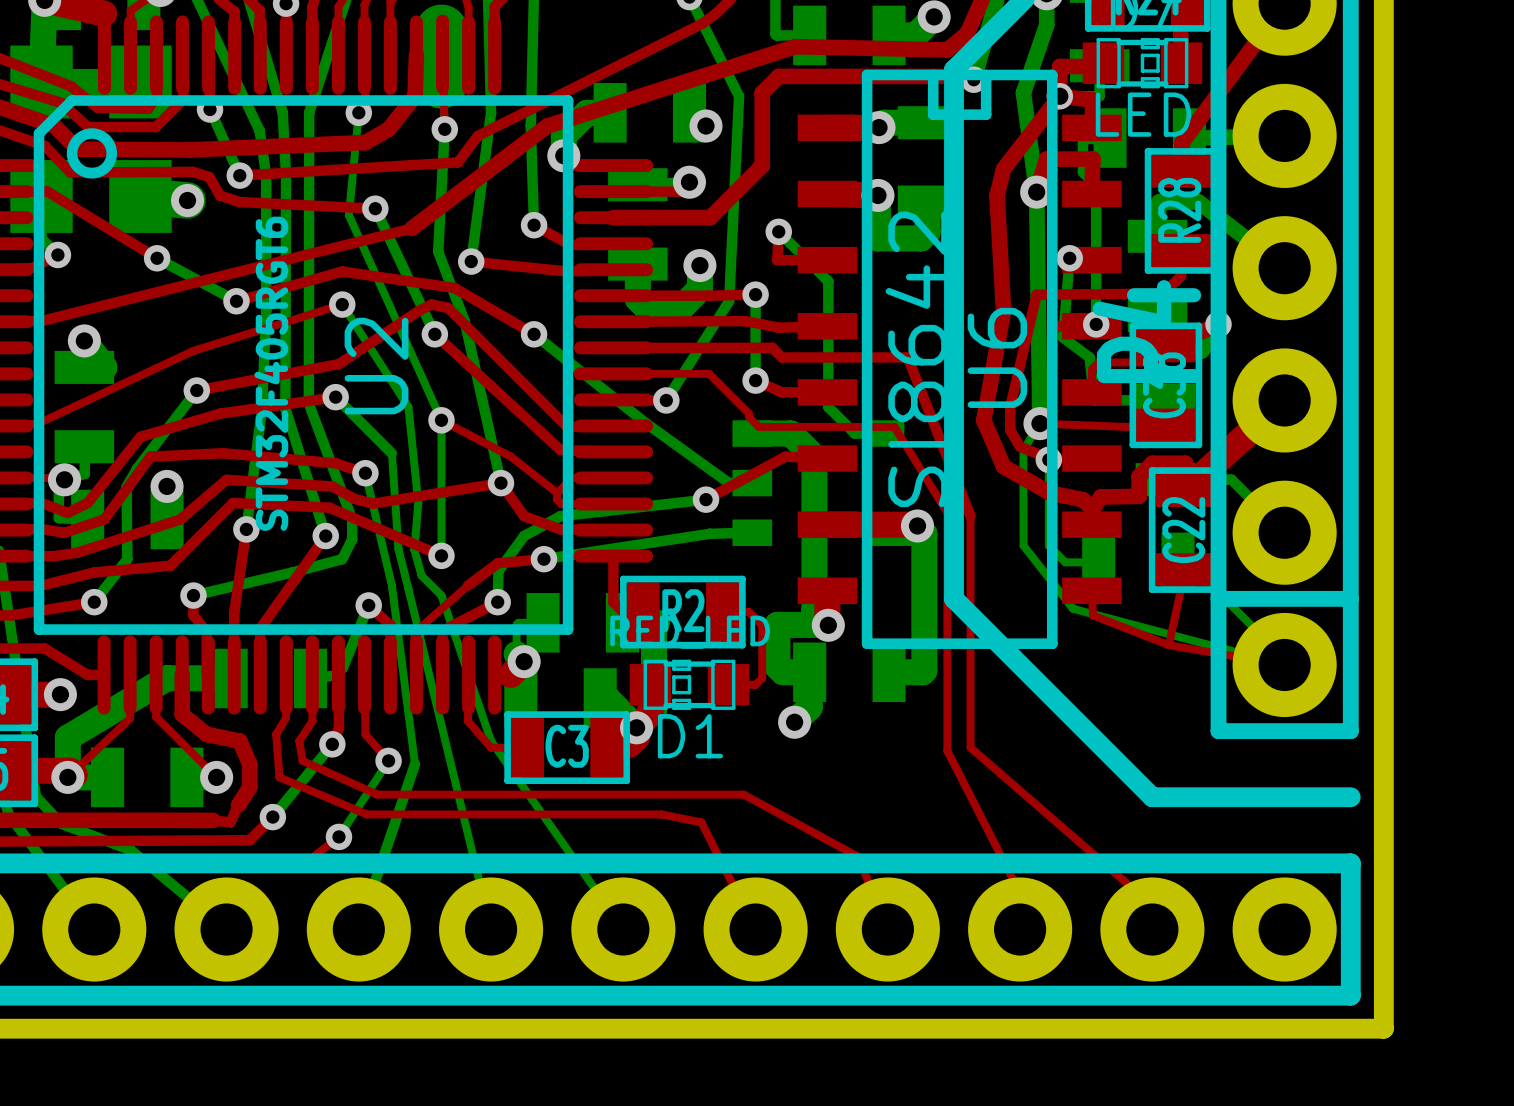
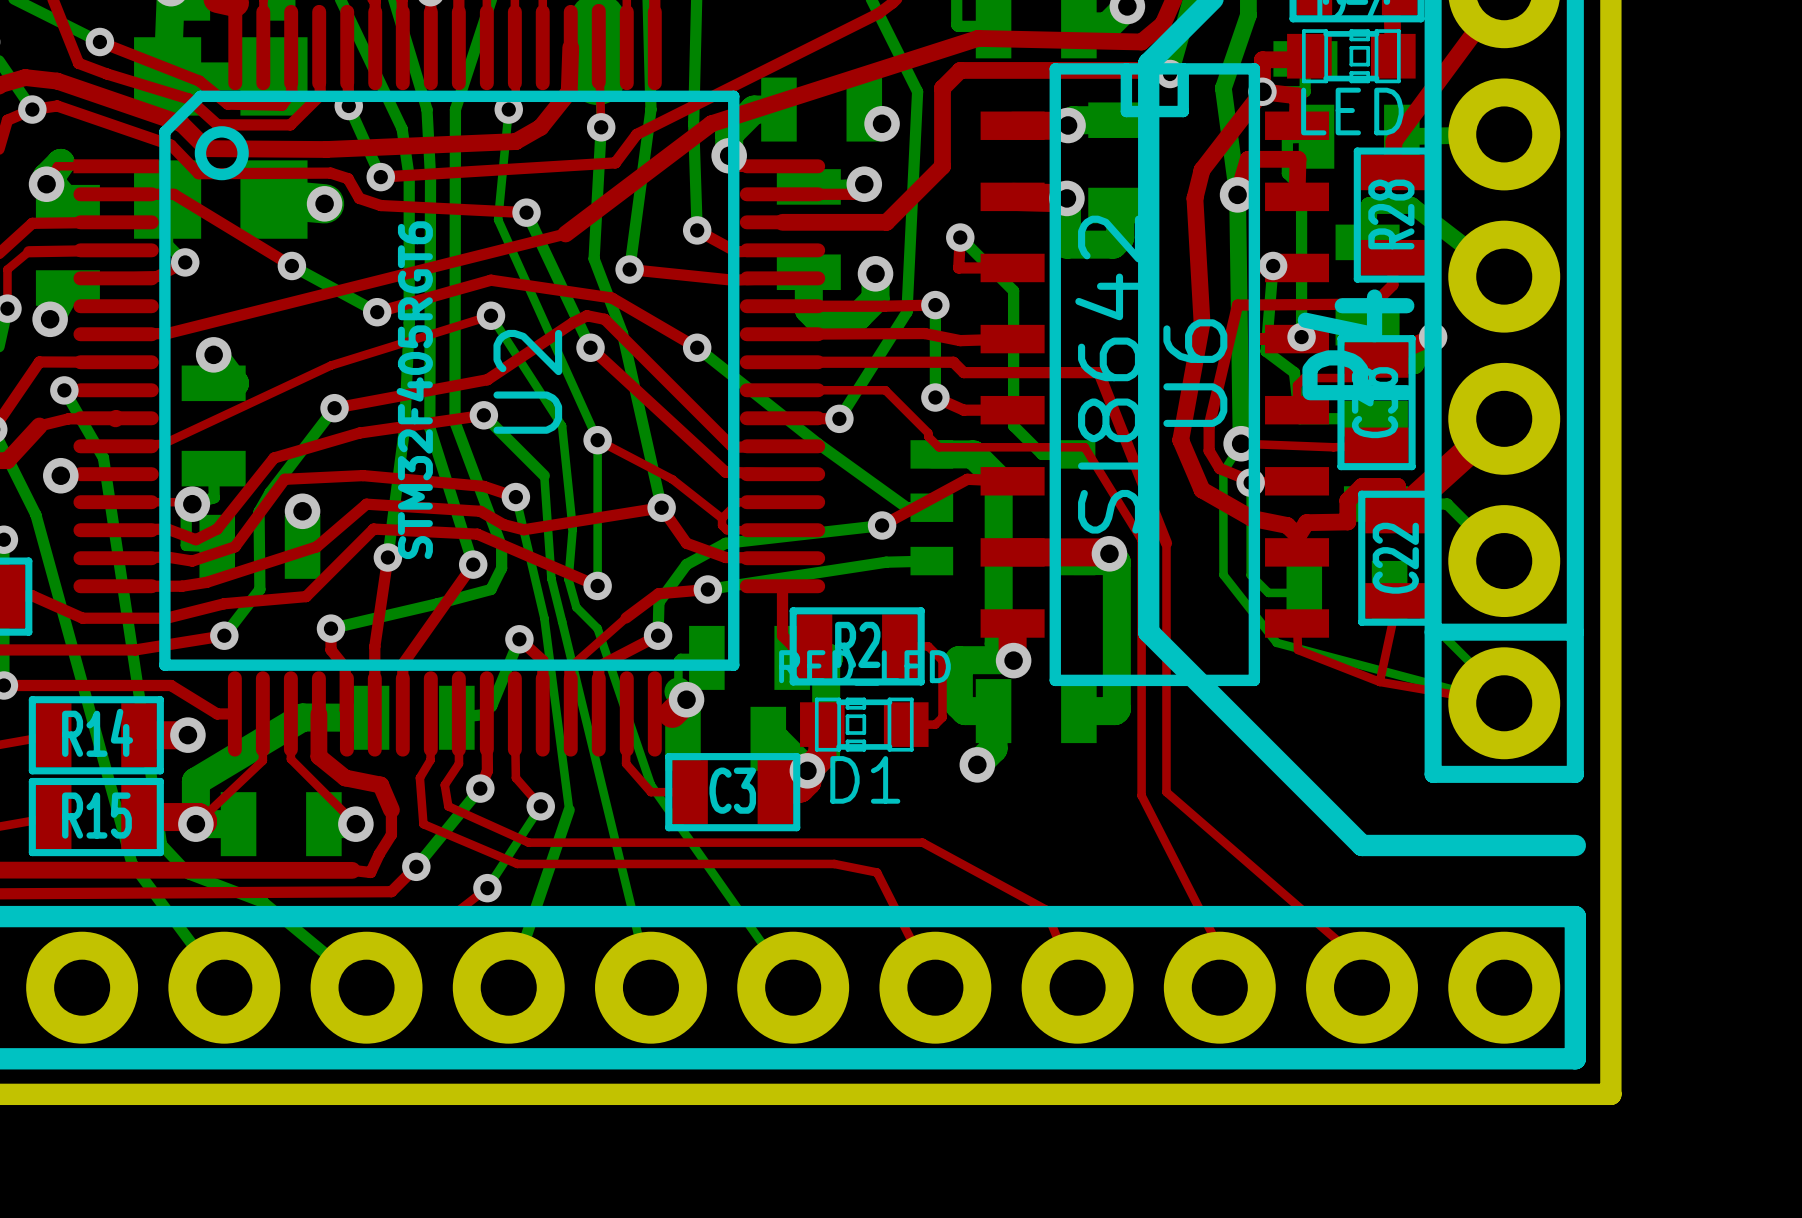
top track width: thick (249, 764) (249, 787) (238, 805) -> thin (391, 809) (391, 834) (379, 854)

